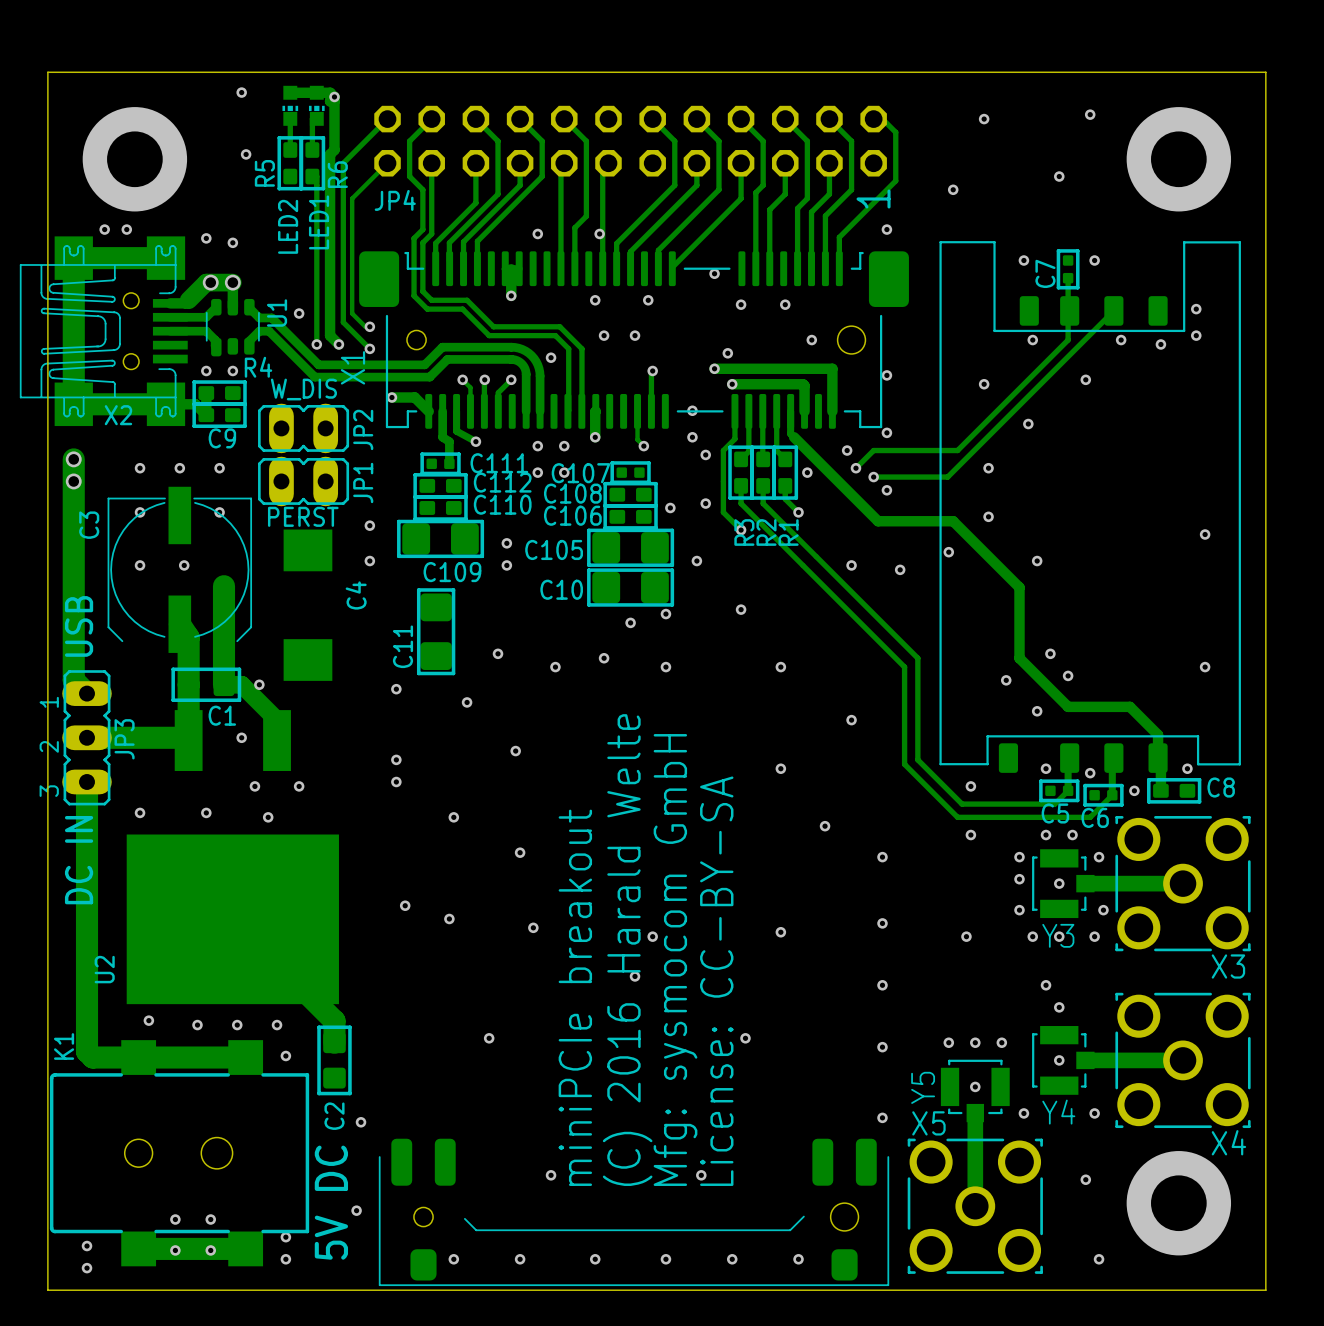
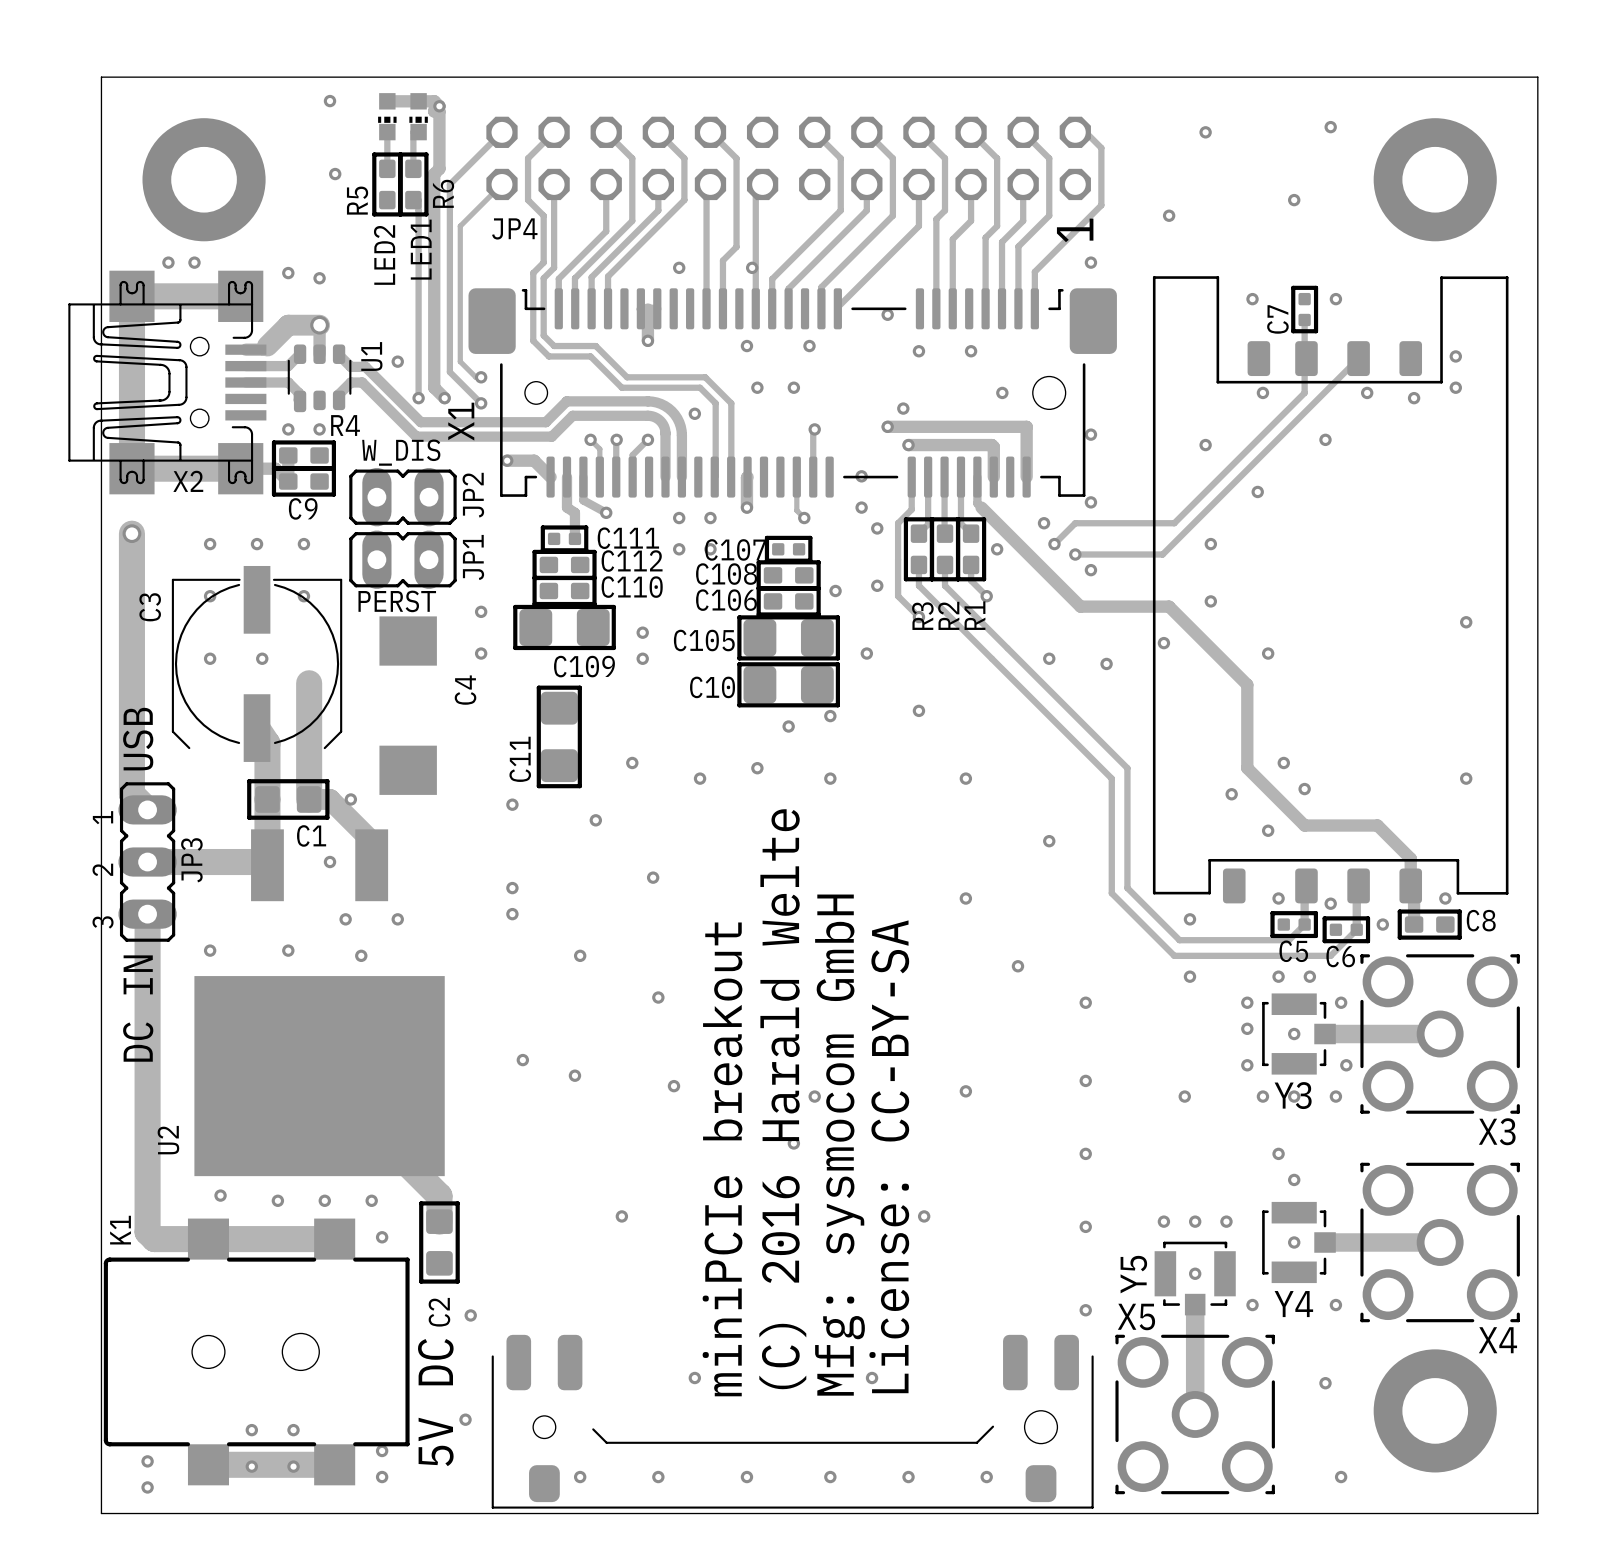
via: (210, 282) -> none
via: (73, 481) -> none

